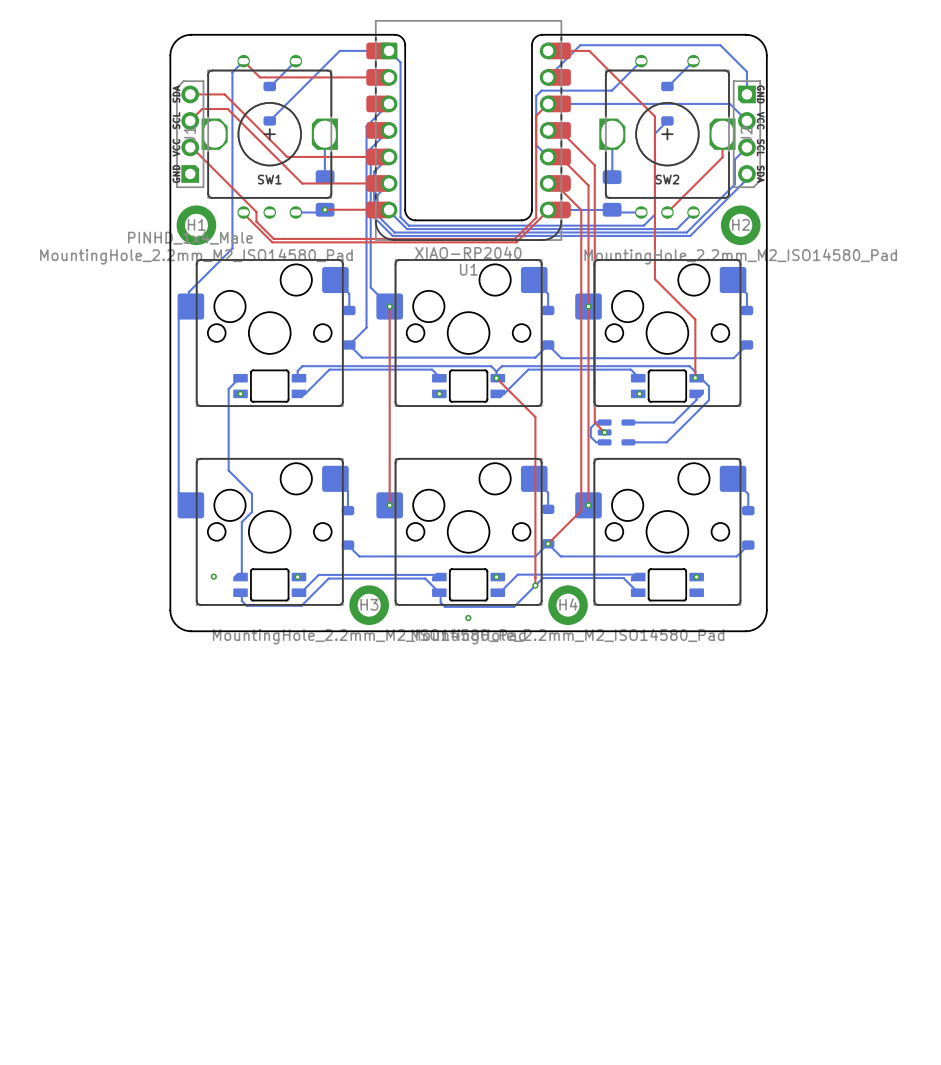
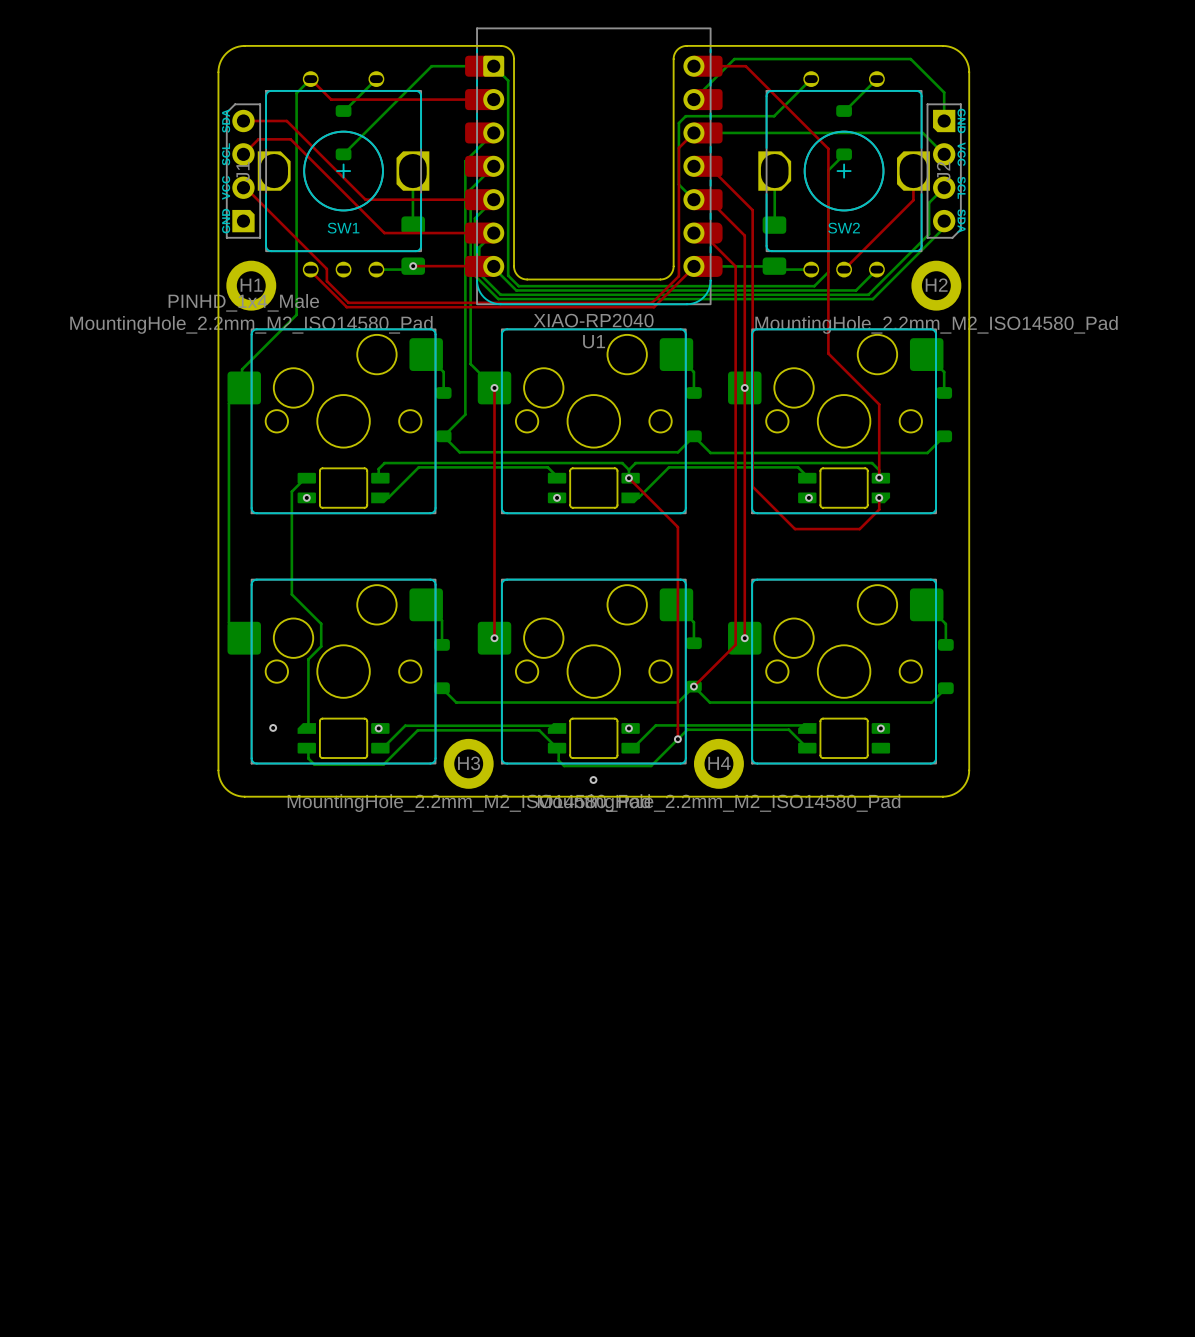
bottom track: (696, 378) (700, 378) (709, 386) (709, 400) (666, 442) (628, 442) -> none
top track: (594, 384) (594, 422) (604, 432) -> (752, 486) (795, 529) (859, 529) (879, 509) (879, 497)
via: none -> (879, 497)
bottom track: (696, 393) (696, 399) (673, 422) (628, 422) -> none
bottom track: (604, 422) (596, 422) (590, 427) (590, 436) (596, 442) (604, 442) -> none
via: (604, 432) -> none
part: (616, 432) -> none

